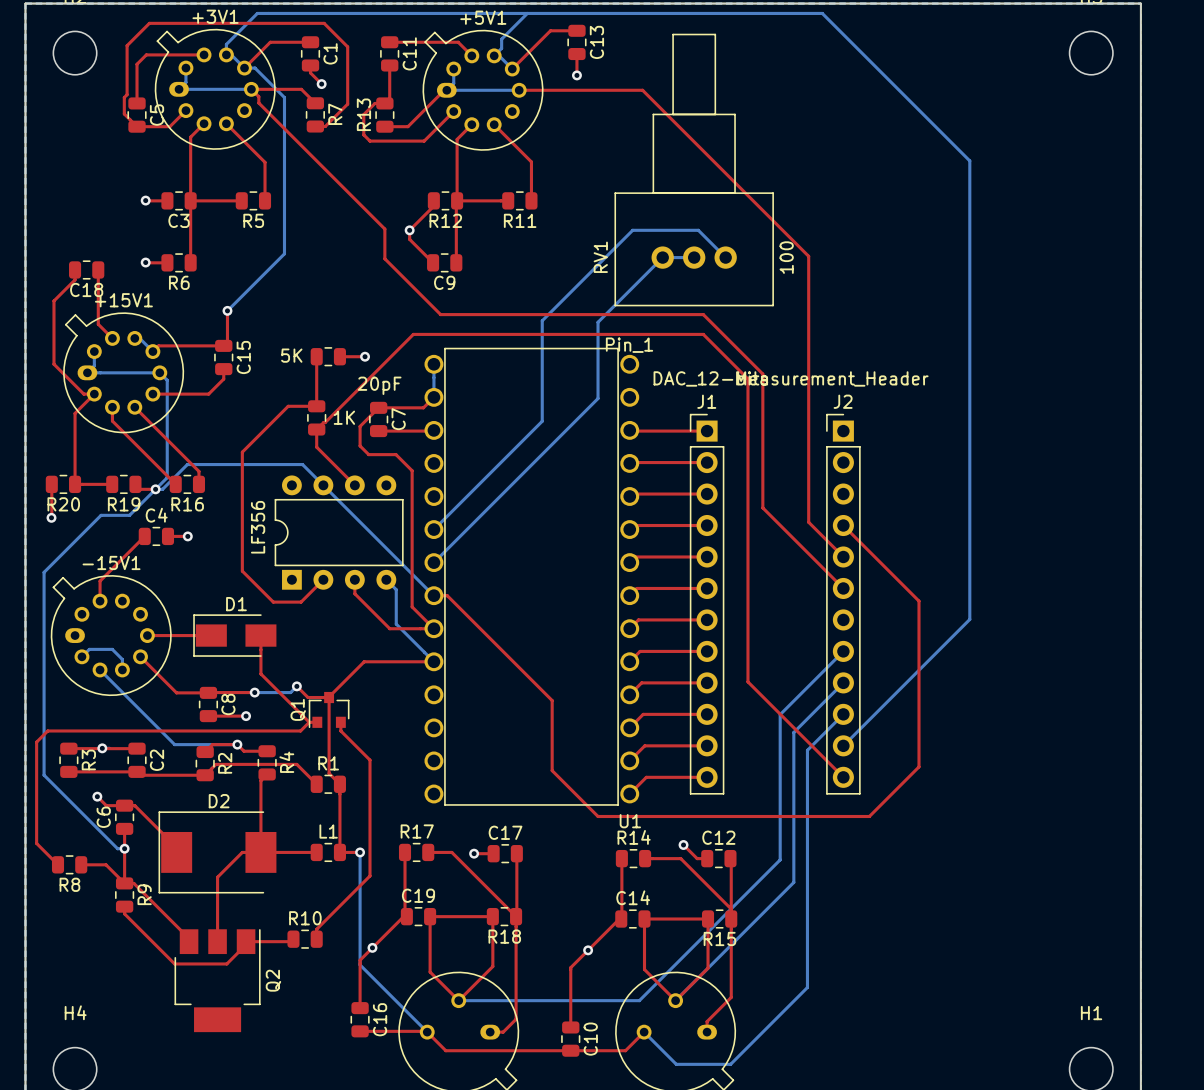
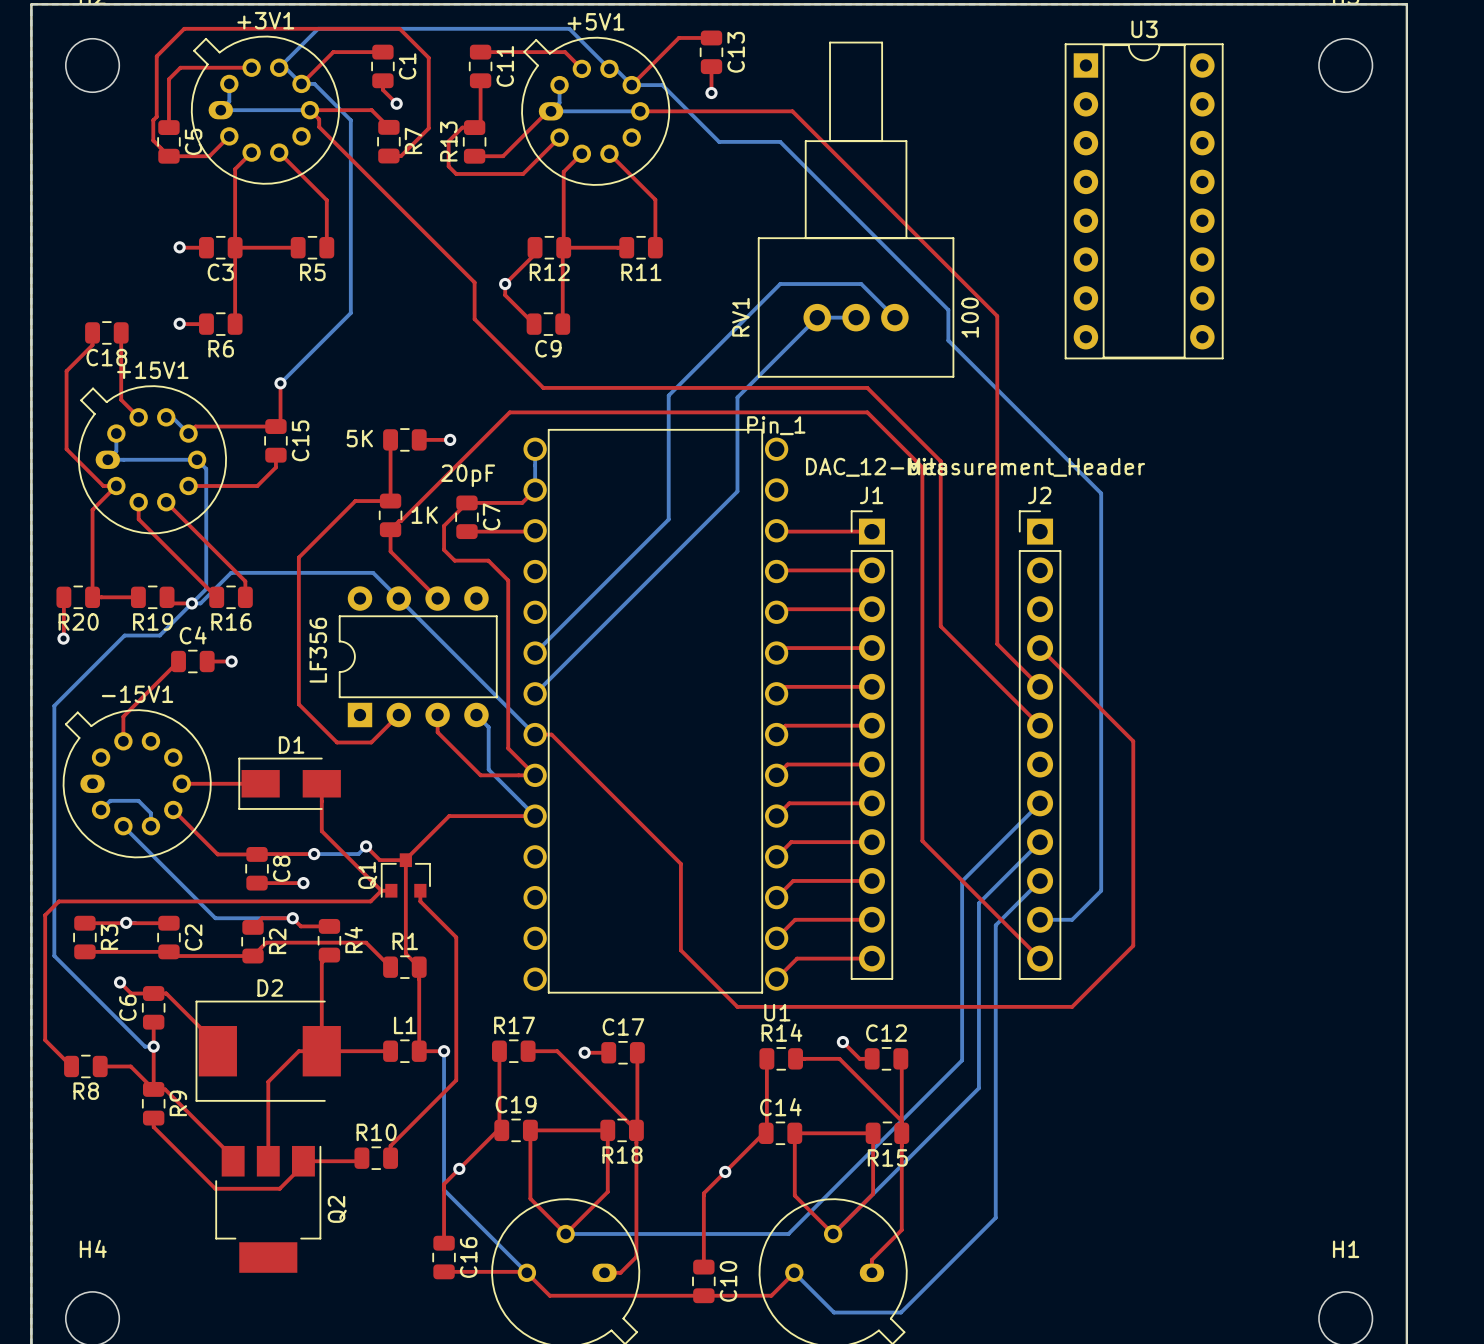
bottom track: (527, 13) (501, 39) (501, 48) (494, 55) -> (279, 67) (318, 28) (569, 28) (609, 68)
bottom track: (226, 54) (226, 44) (257, 13) (822, 13) (969, 160) (969, 619) (843, 745) -> (631, 85) (662, 85) (719, 141) (780, 141) (948, 310) (948, 340) (1101, 493) (1101, 890) (1072, 919) (1040, 919)
U3: none -> (1144, 201)

